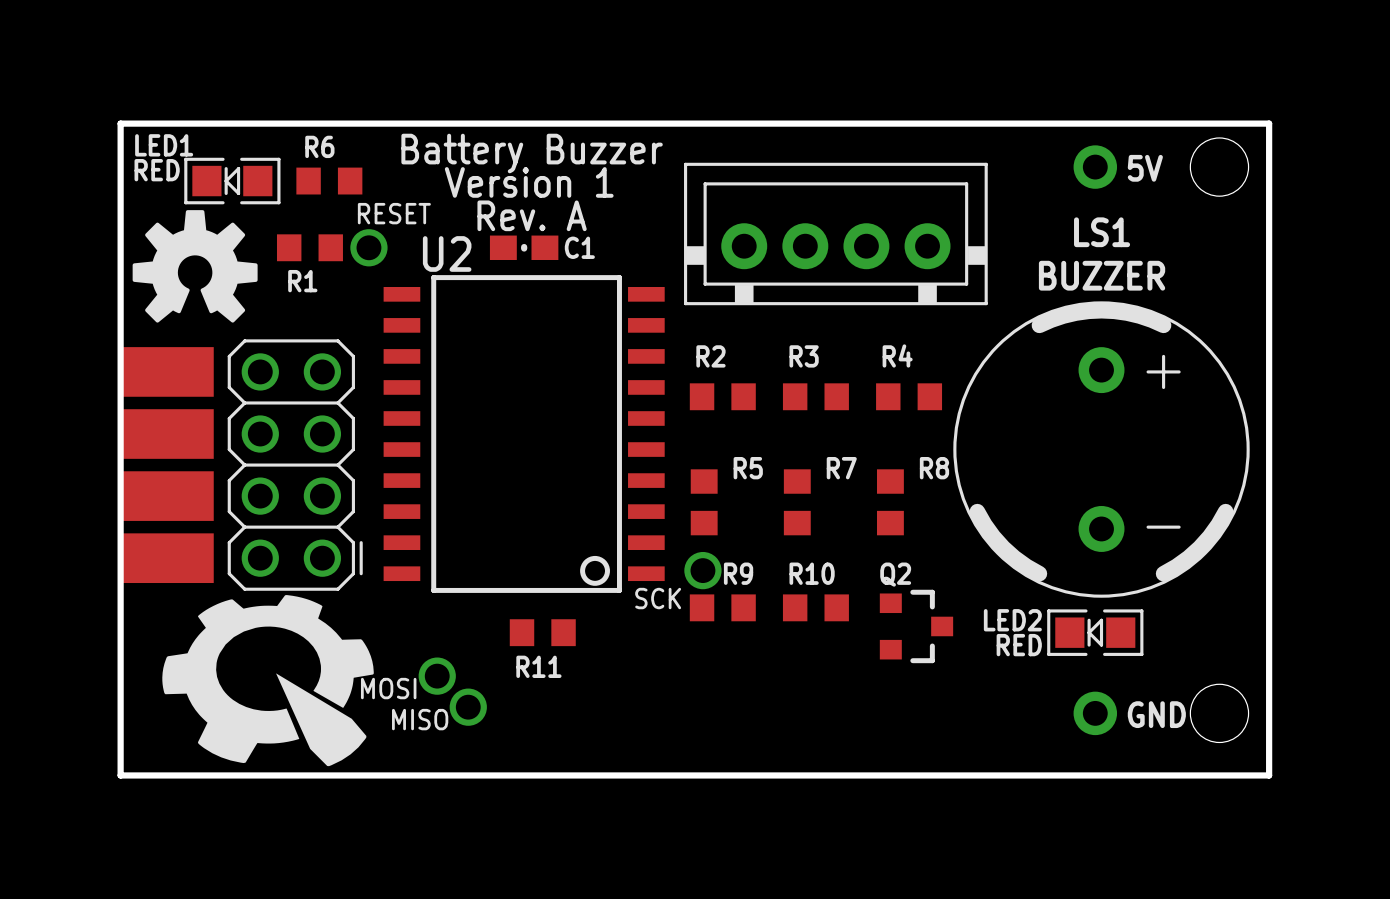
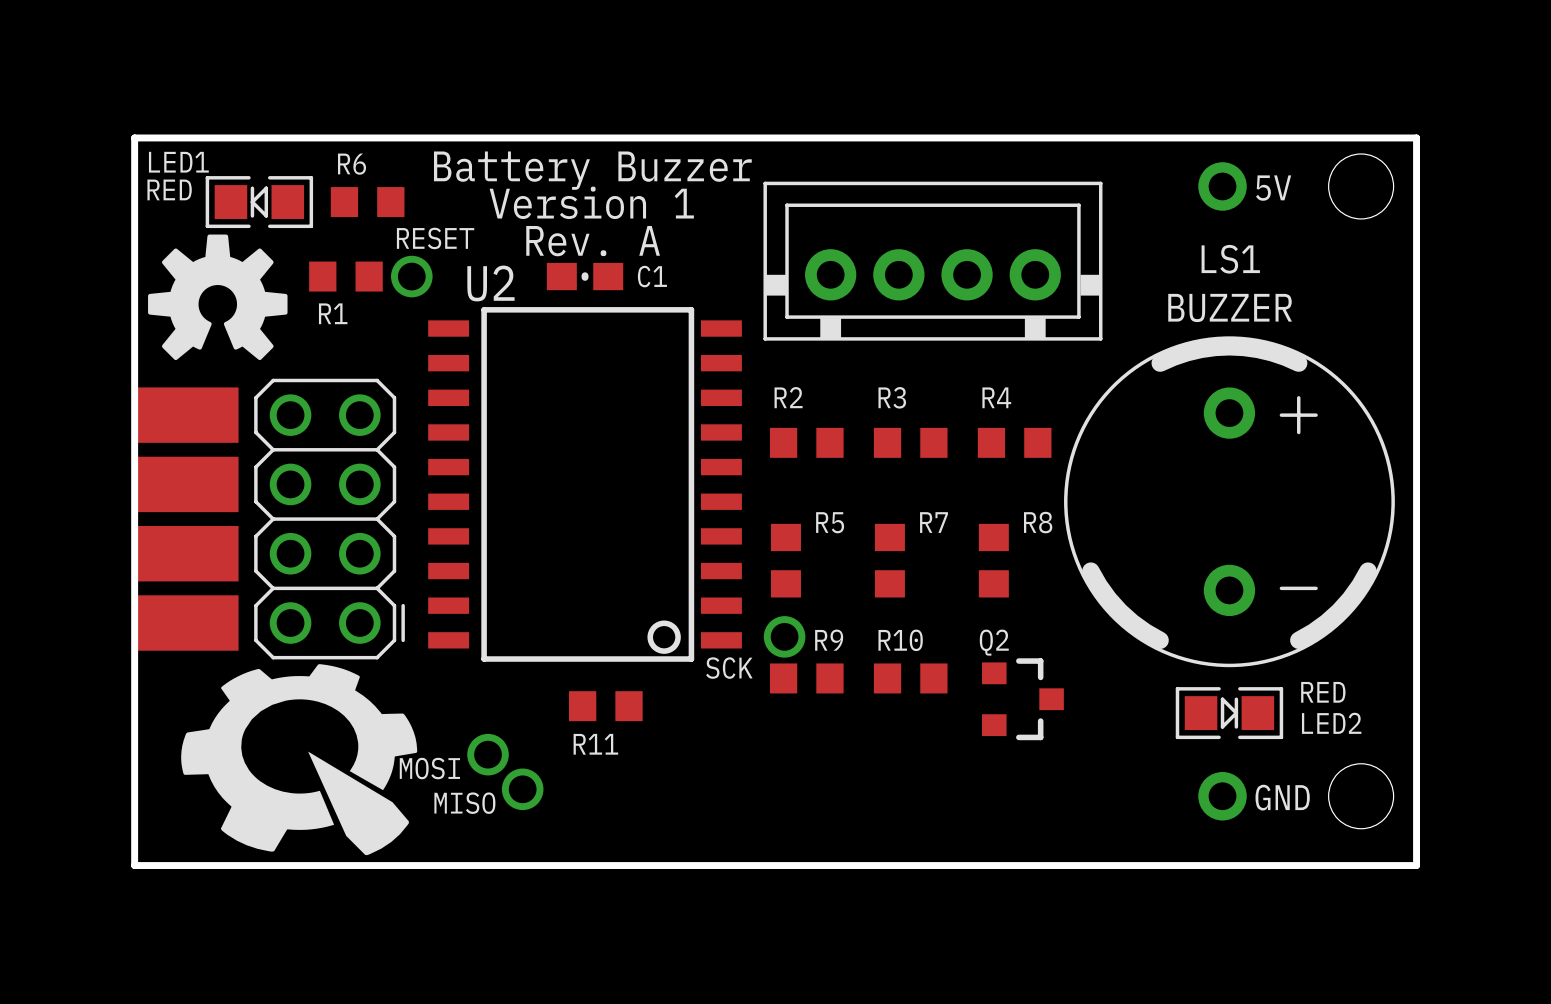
LED2 rotation: 0° (1095, 632) -> 180° (1229, 713)

